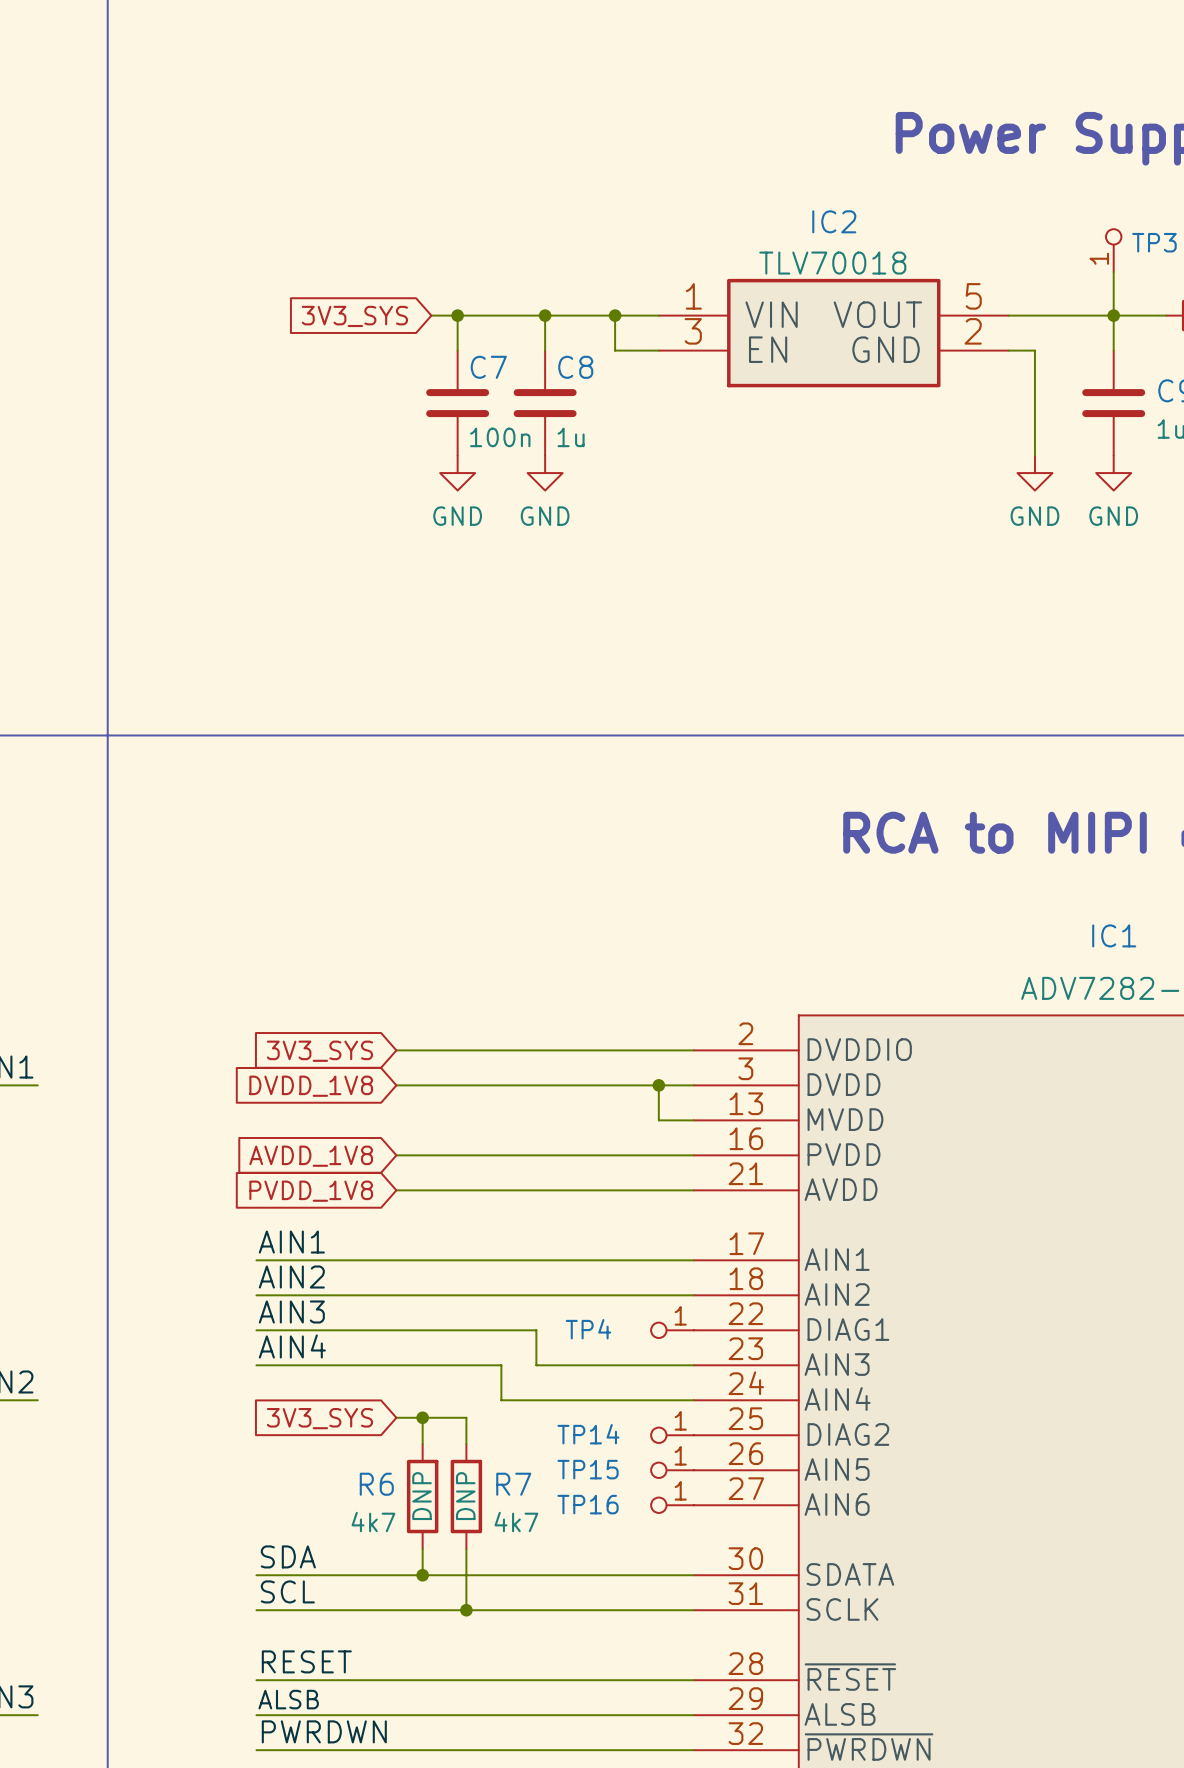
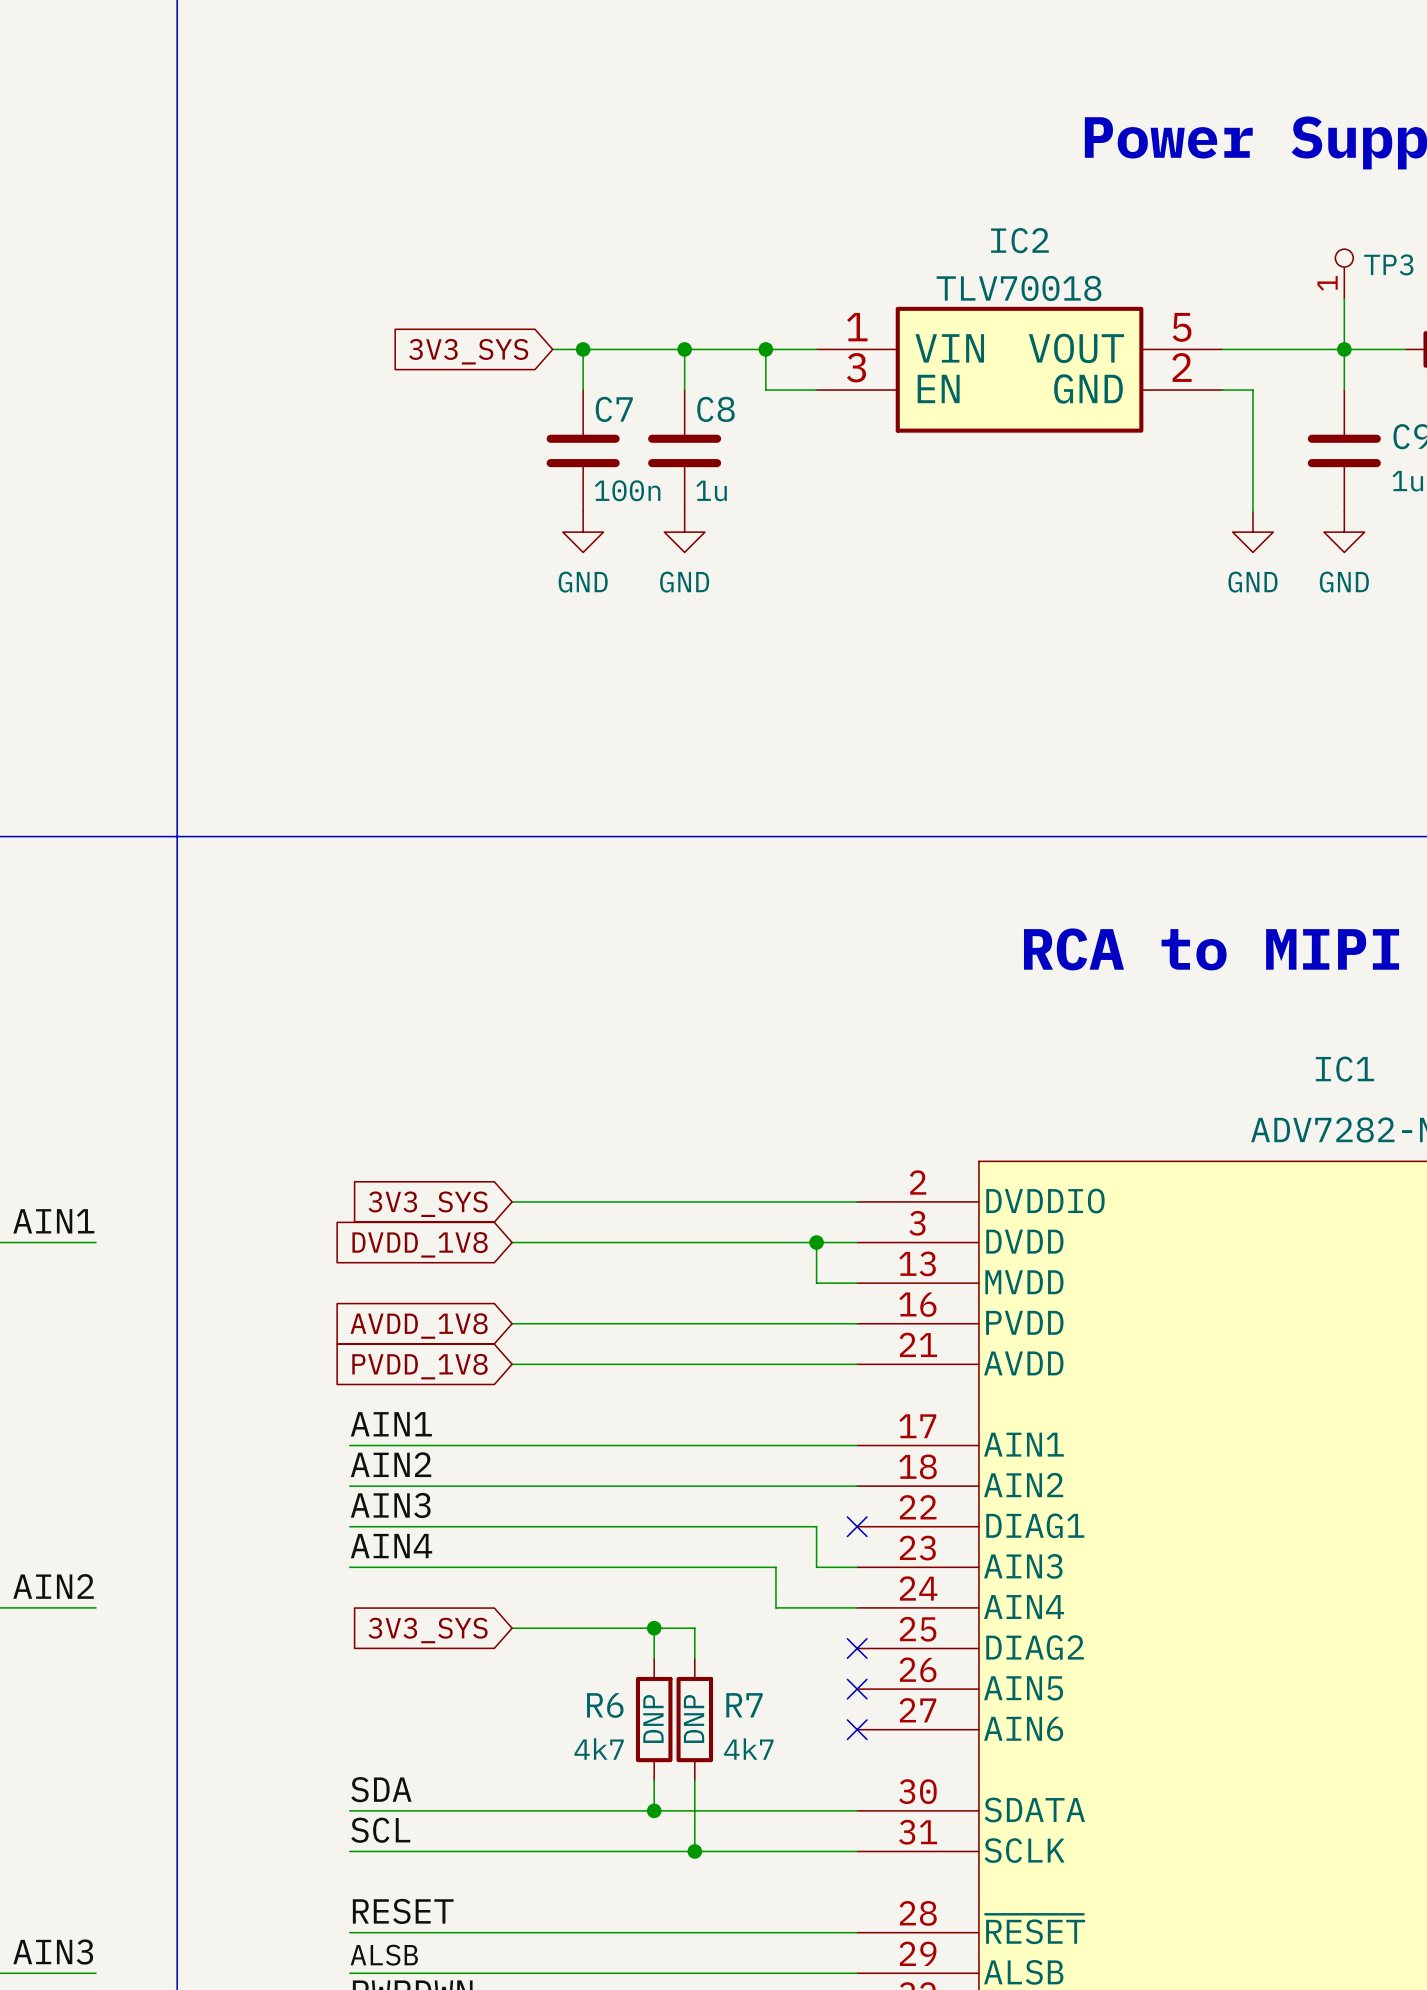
wire: (536, 1330) (536, 1365) -> (633, 1567) (674, 1567)
wire: none -> (674, 1526) (816, 1526) (816, 1567)
TP4: (672, 1330) -> none
no-connect mark: none -> (857, 1526)
wire: (501, 1365) (501, 1400) (623, 1400) -> none
wire: (623, 1365) (658, 1365) -> (775, 1567) (775, 1607)
wire: (422, 1417) (422, 1444) -> (654, 1628) (654, 1658)
junction: (422, 1417) -> none
wire: (466, 1417) (466, 1444) -> (593, 1628) (694, 1628) (694, 1658)
junction: none -> (654, 1628)
TP14: (672, 1435) -> none
no-connect mark: none -> (857, 1648)
TP15: (672, 1470) -> none
no-connect mark: none -> (857, 1689)
R6 position: (422, 1496) -> (654, 1719)
R7 position: (466, 1496) -> (694, 1719)
TP16: (672, 1505) -> none
no-connect mark: none -> (857, 1729)
wire: (422, 1548) (422, 1575) -> (654, 1780) (654, 1810)
wire: (466, 1548) (466, 1610) -> (694, 1780) (694, 1851)
junction: (422, 1575) -> none
junction: none -> (654, 1810)
junction: (466, 1610) -> none
junction: none -> (694, 1851)

